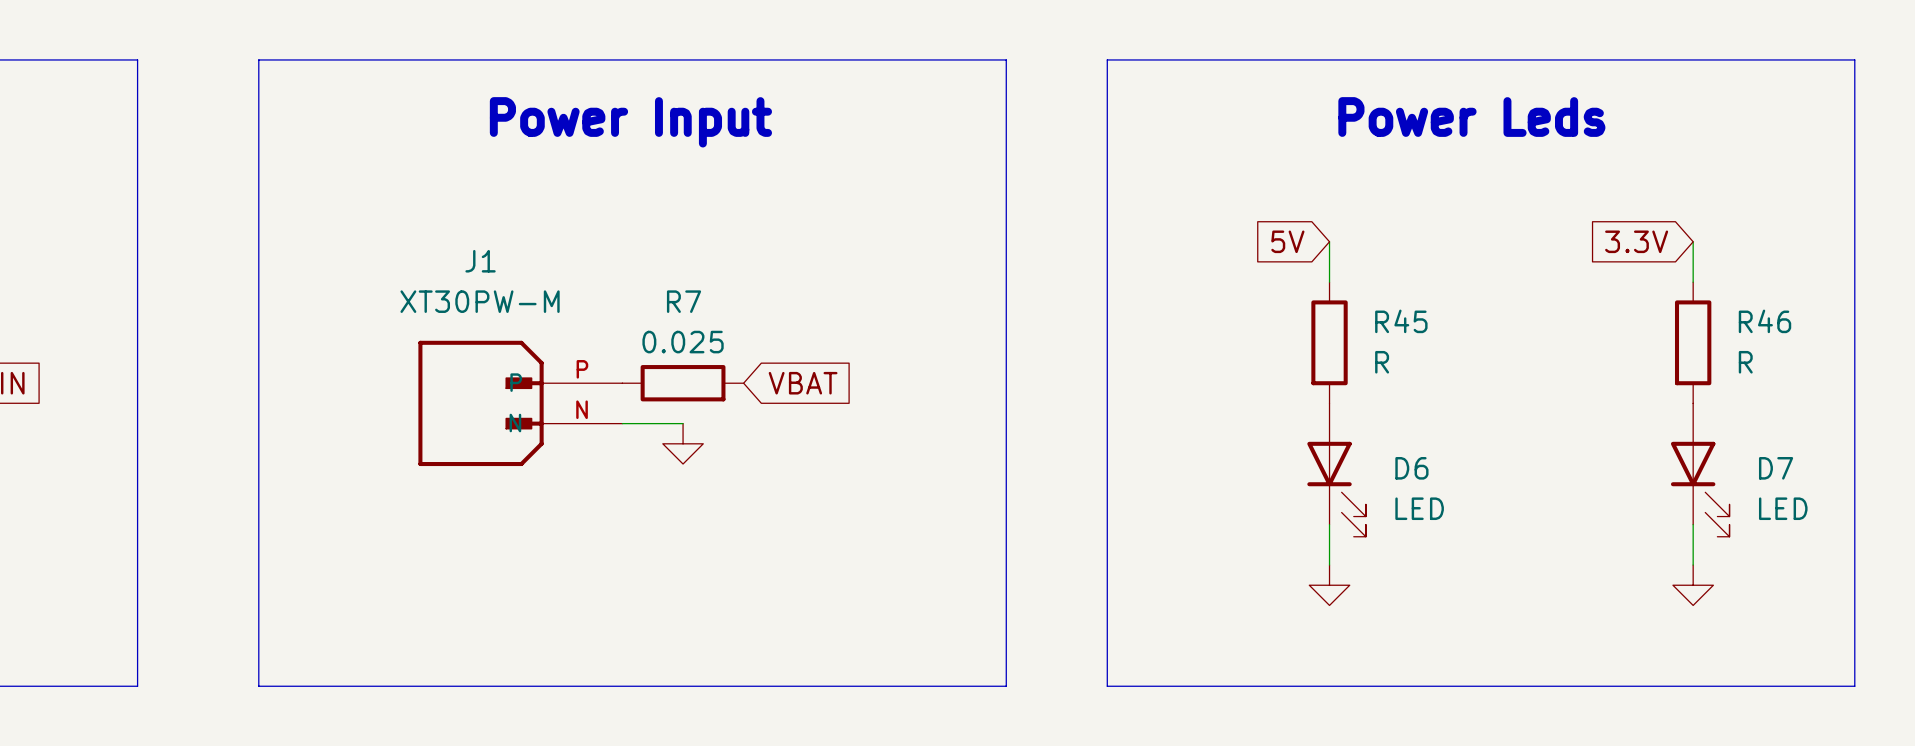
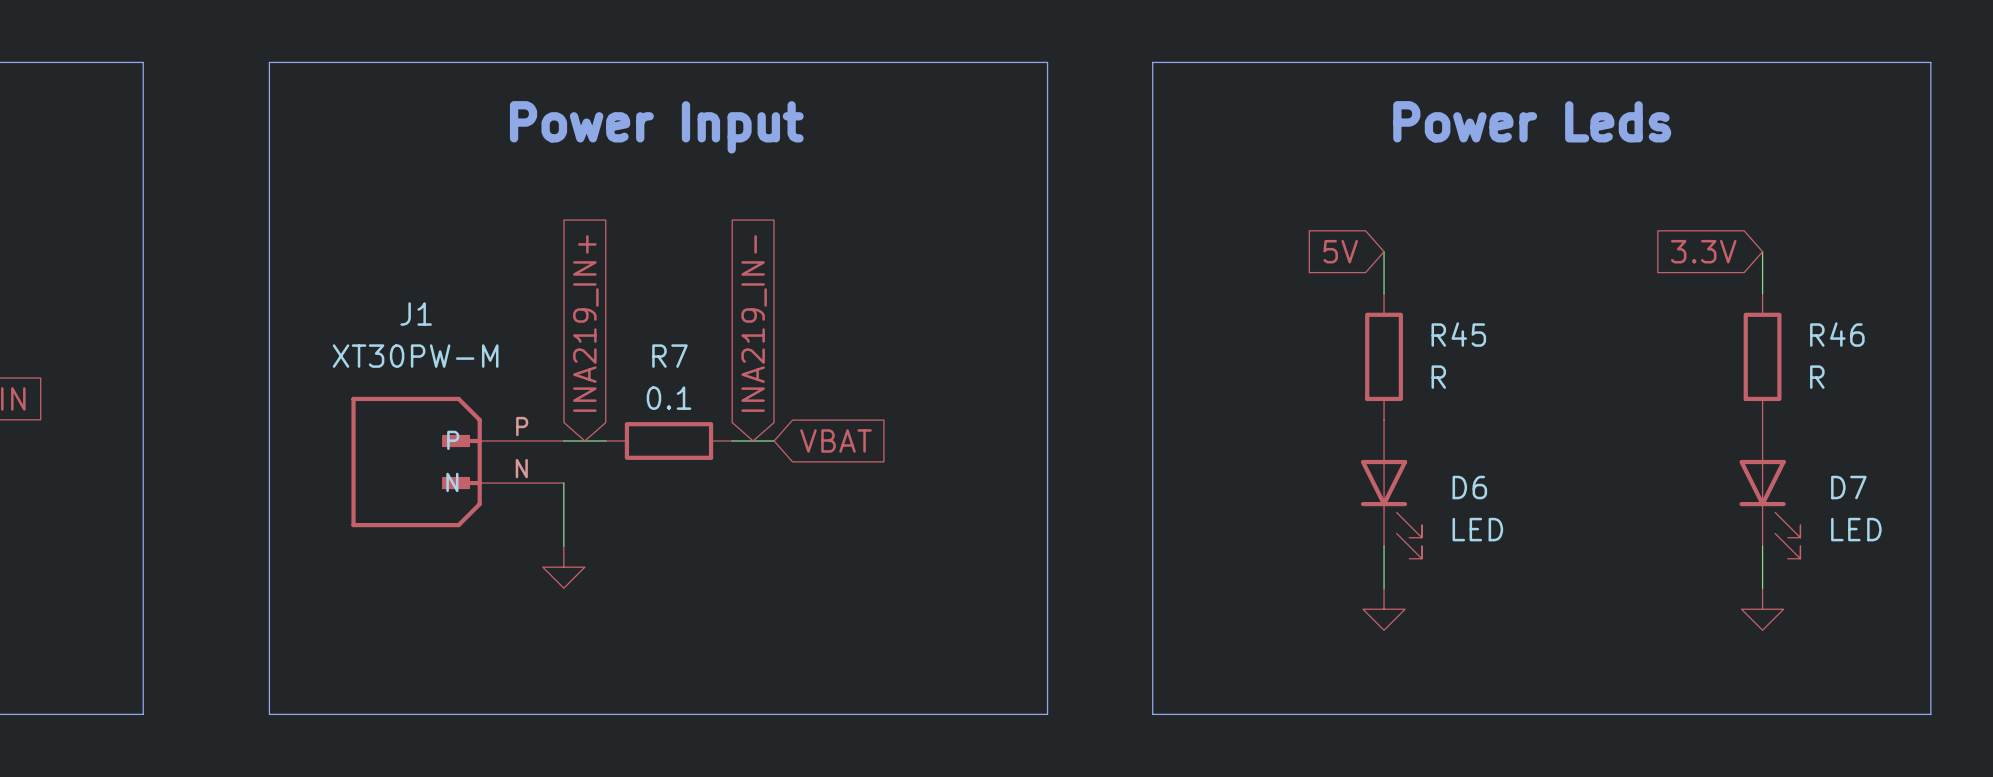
global label: none -> INA219_IN+ (585, 323)
global label: none -> INA219_IN- (754, 323)
R7 value: 0.025 (683, 342) -> 0.1 (668, 398)
R7 position: (683, 383) -> (668, 440)
global label position: VBAT (803, 383) -> VBAT (836, 440)
J1 position: (520, 403) -> (457, 462)
wire: (622, 423) (683, 423) -> none
wire: none -> (732, 440) (774, 440)
power symbol position: (683, 443) -> (563, 567)
wire: none -> (563, 483) (563, 546)

